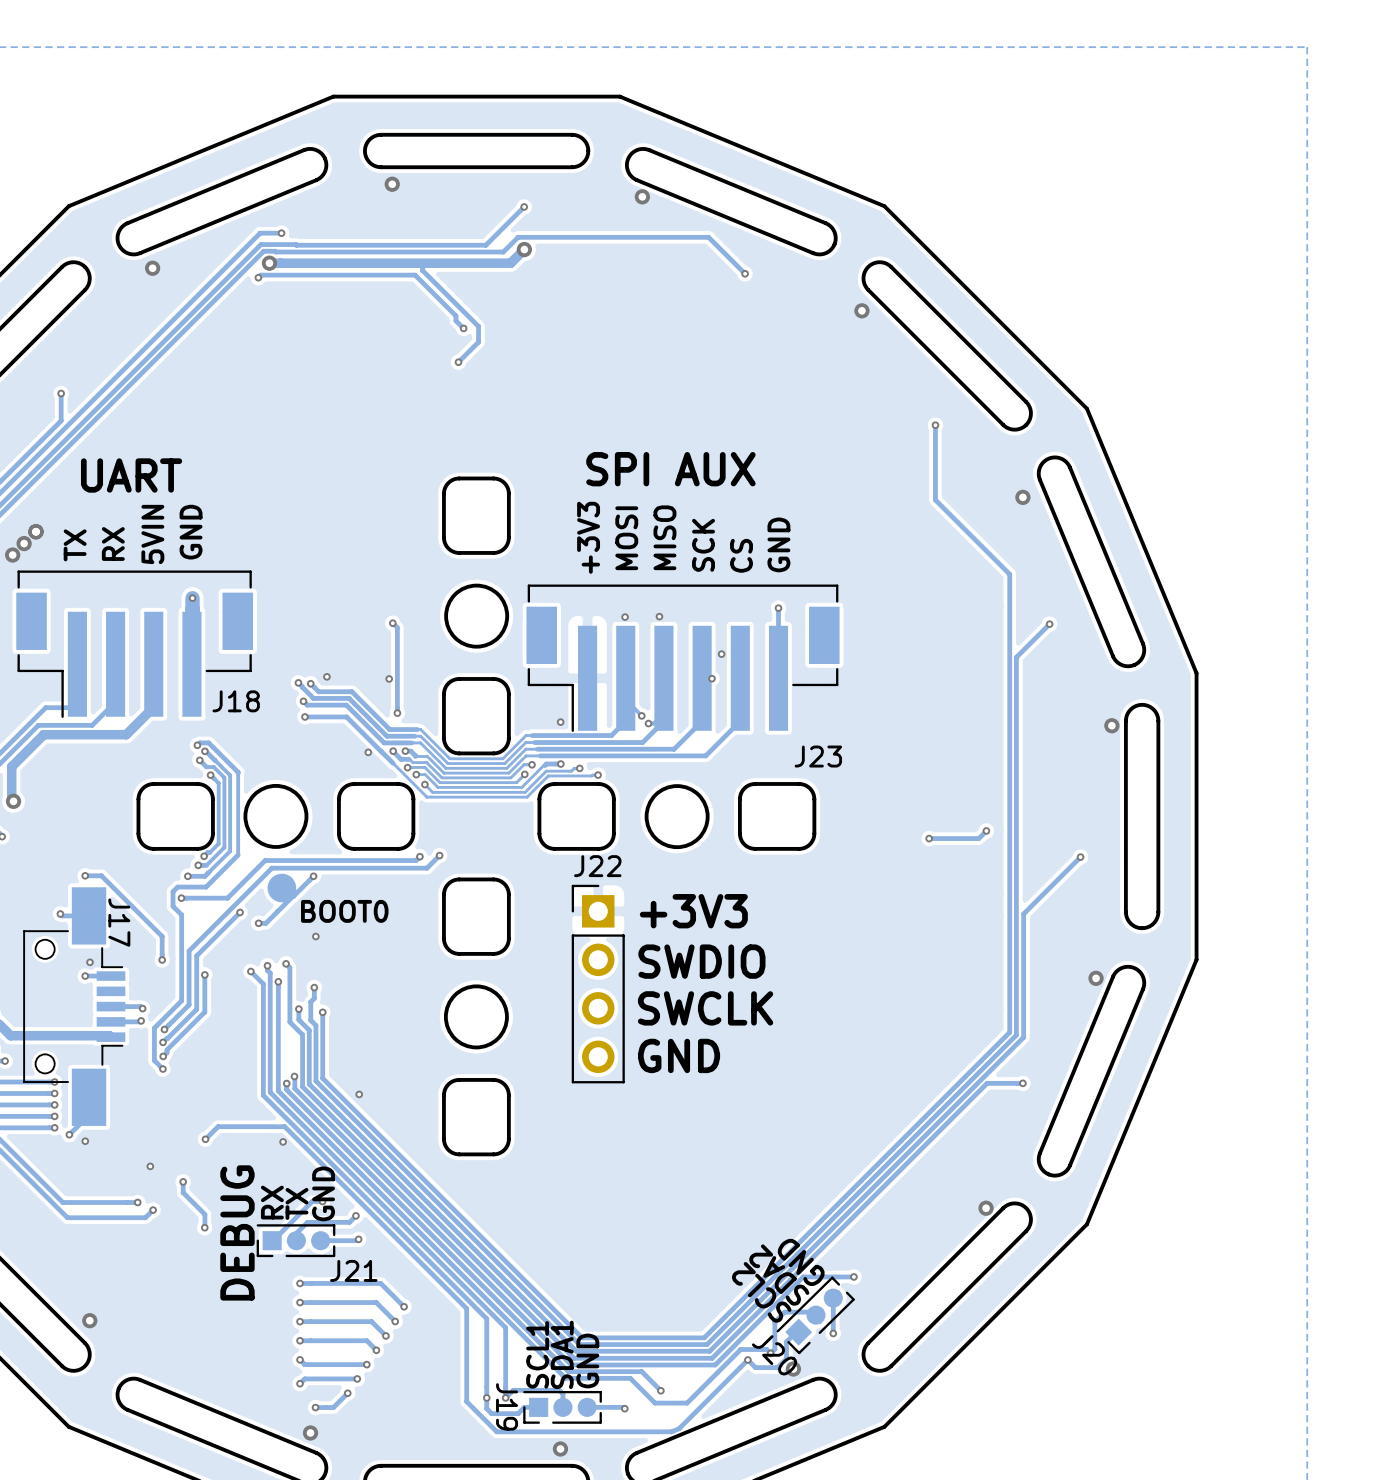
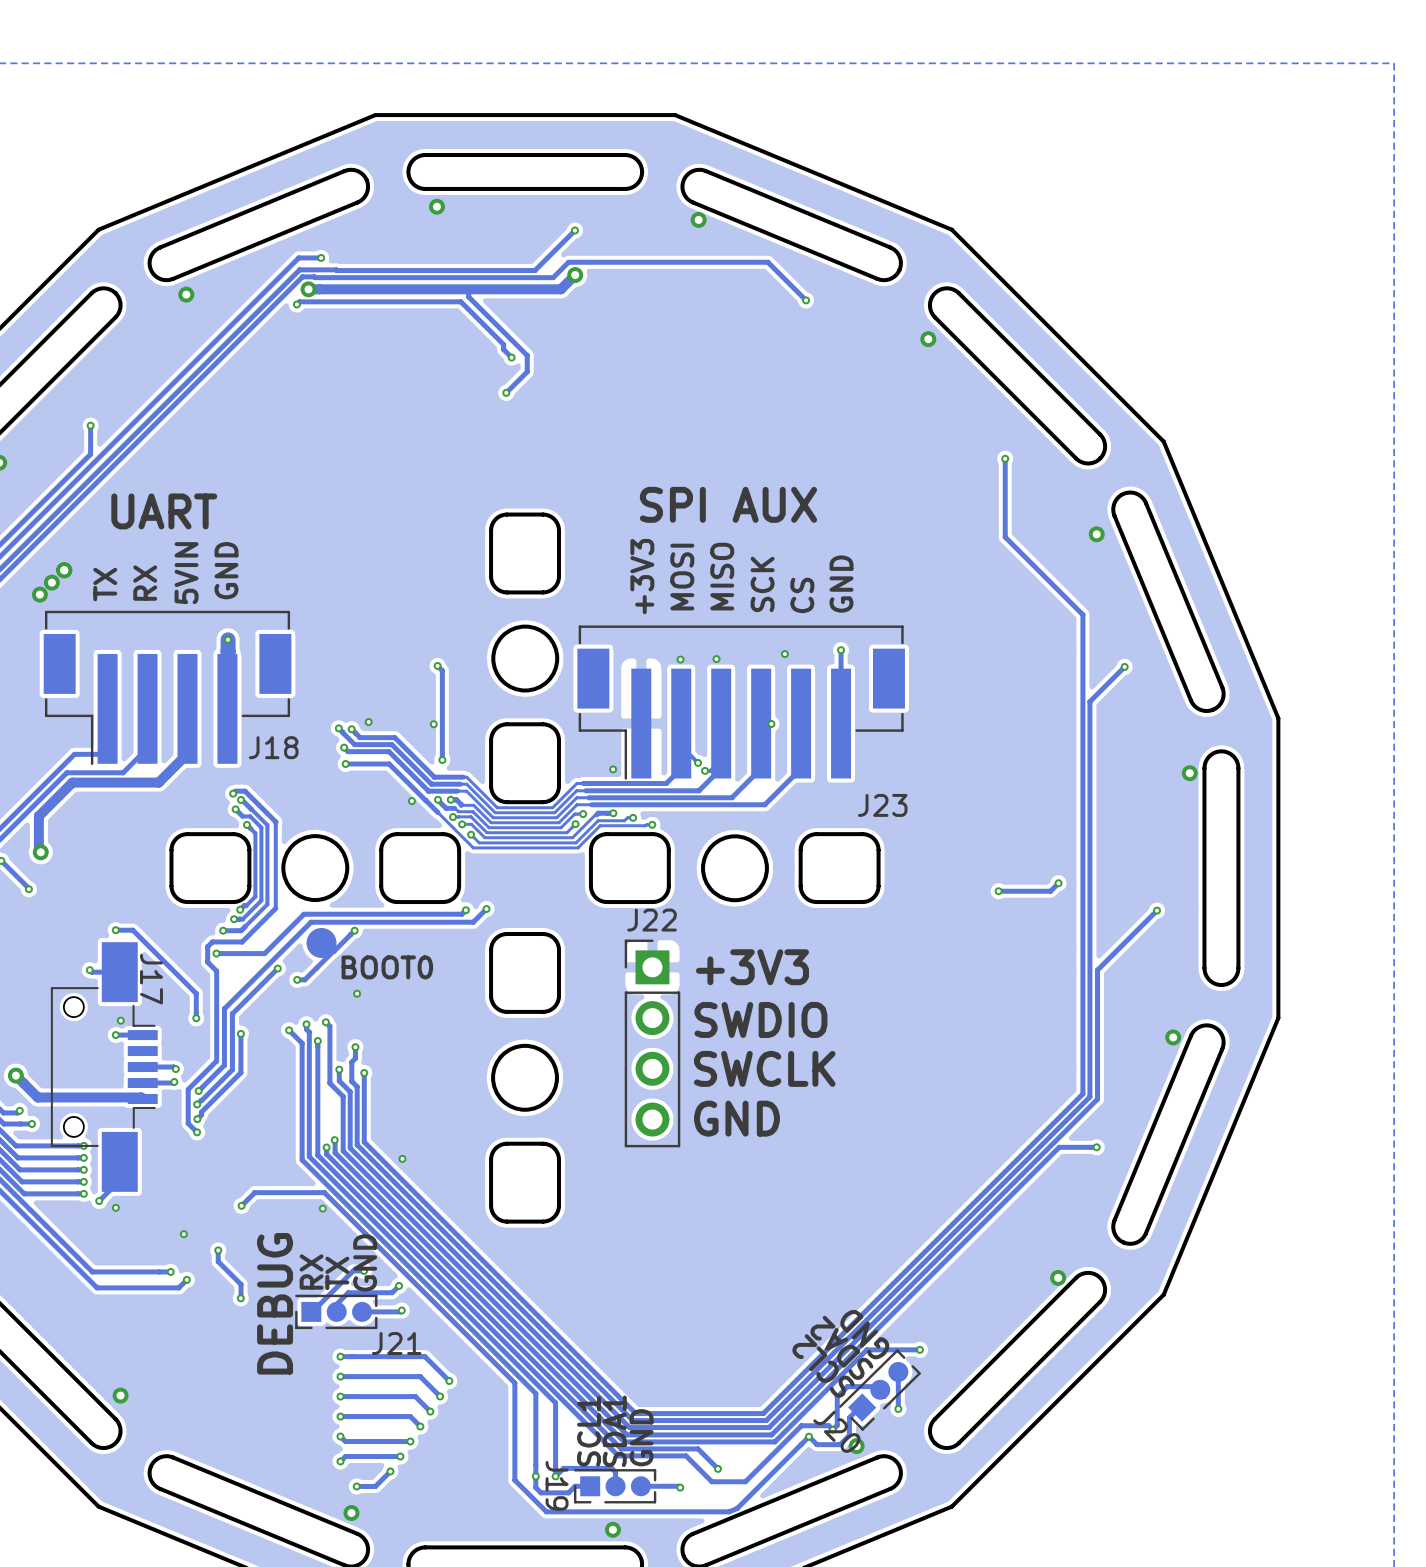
via position: (721, 654) -> (784, 654)

